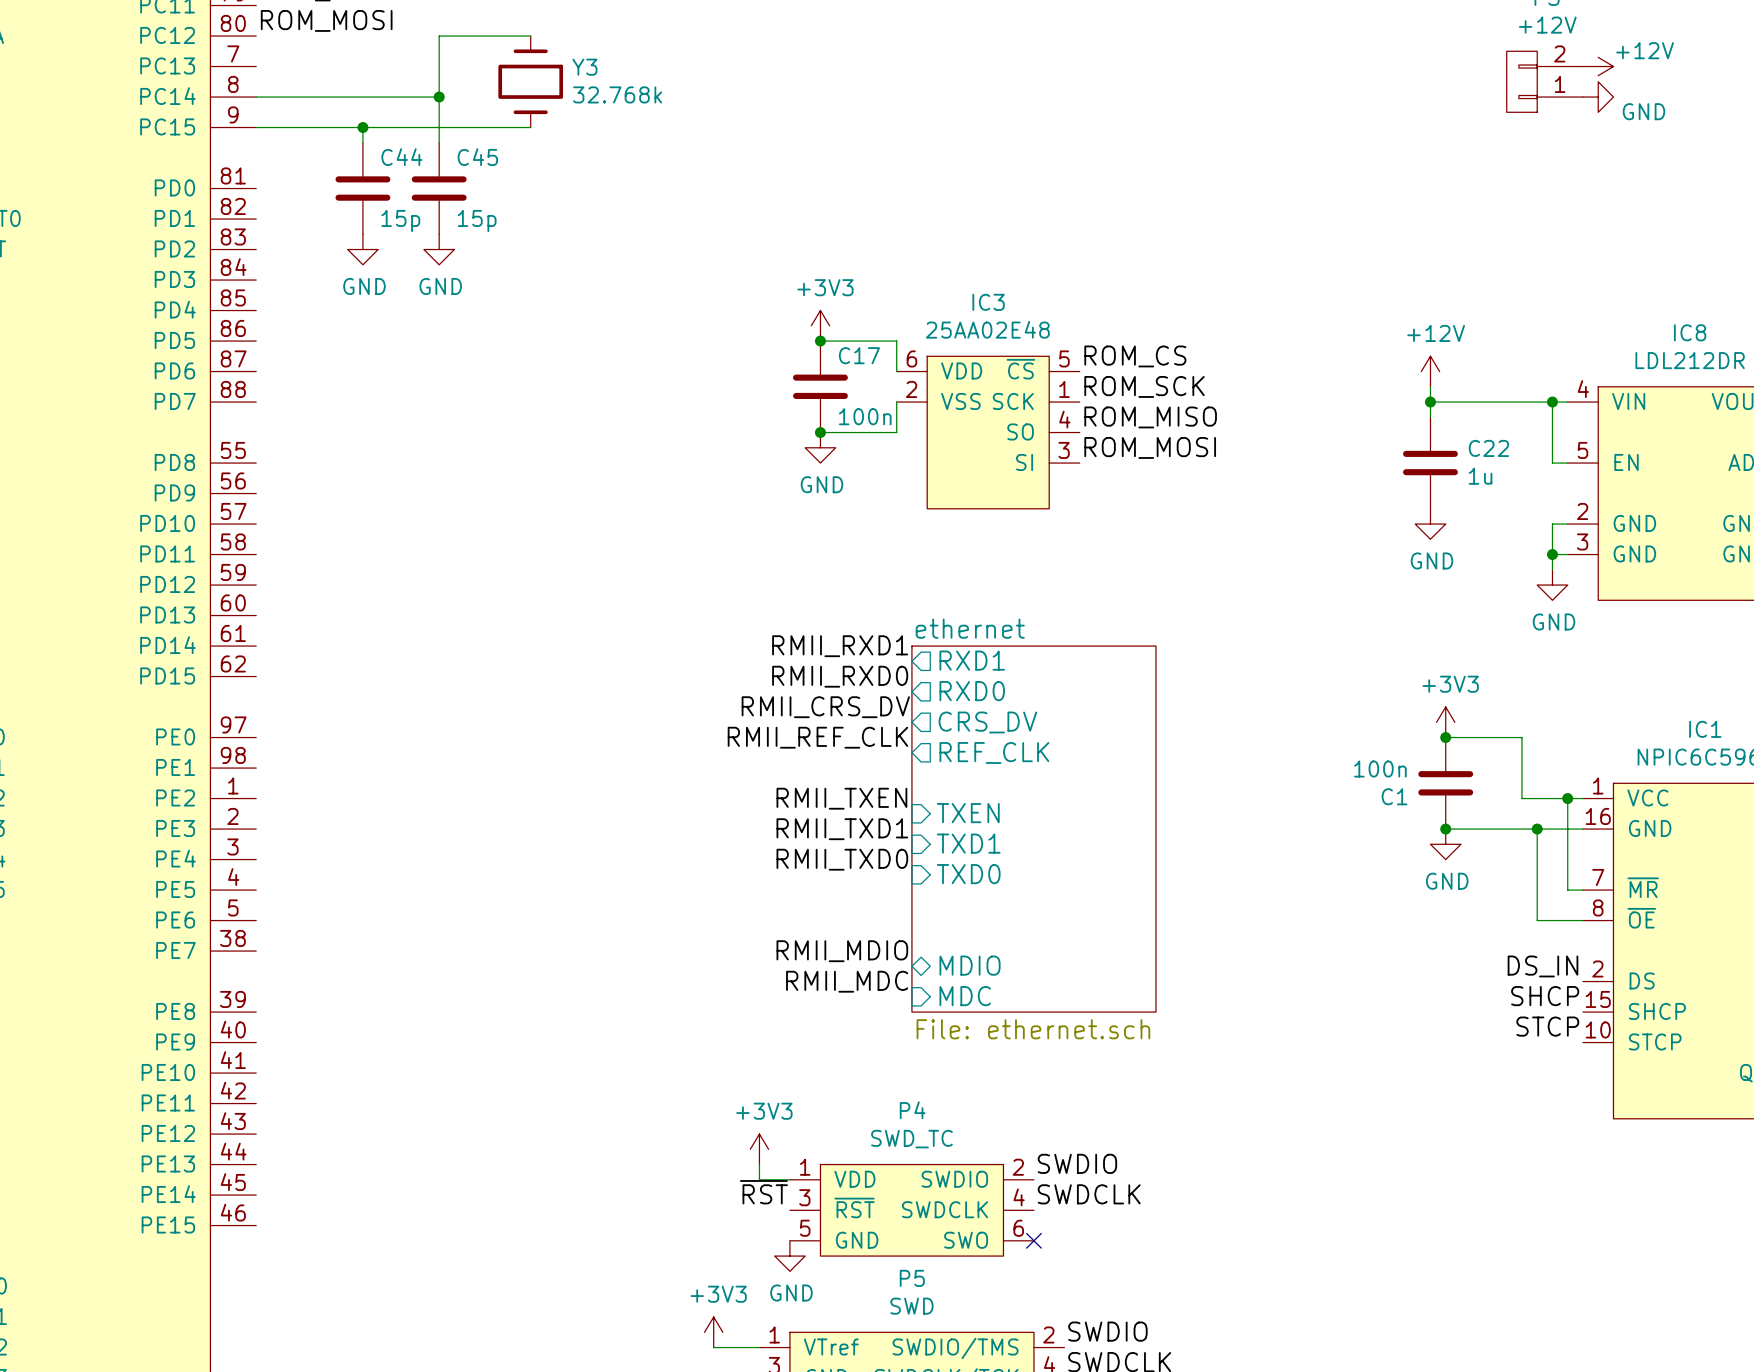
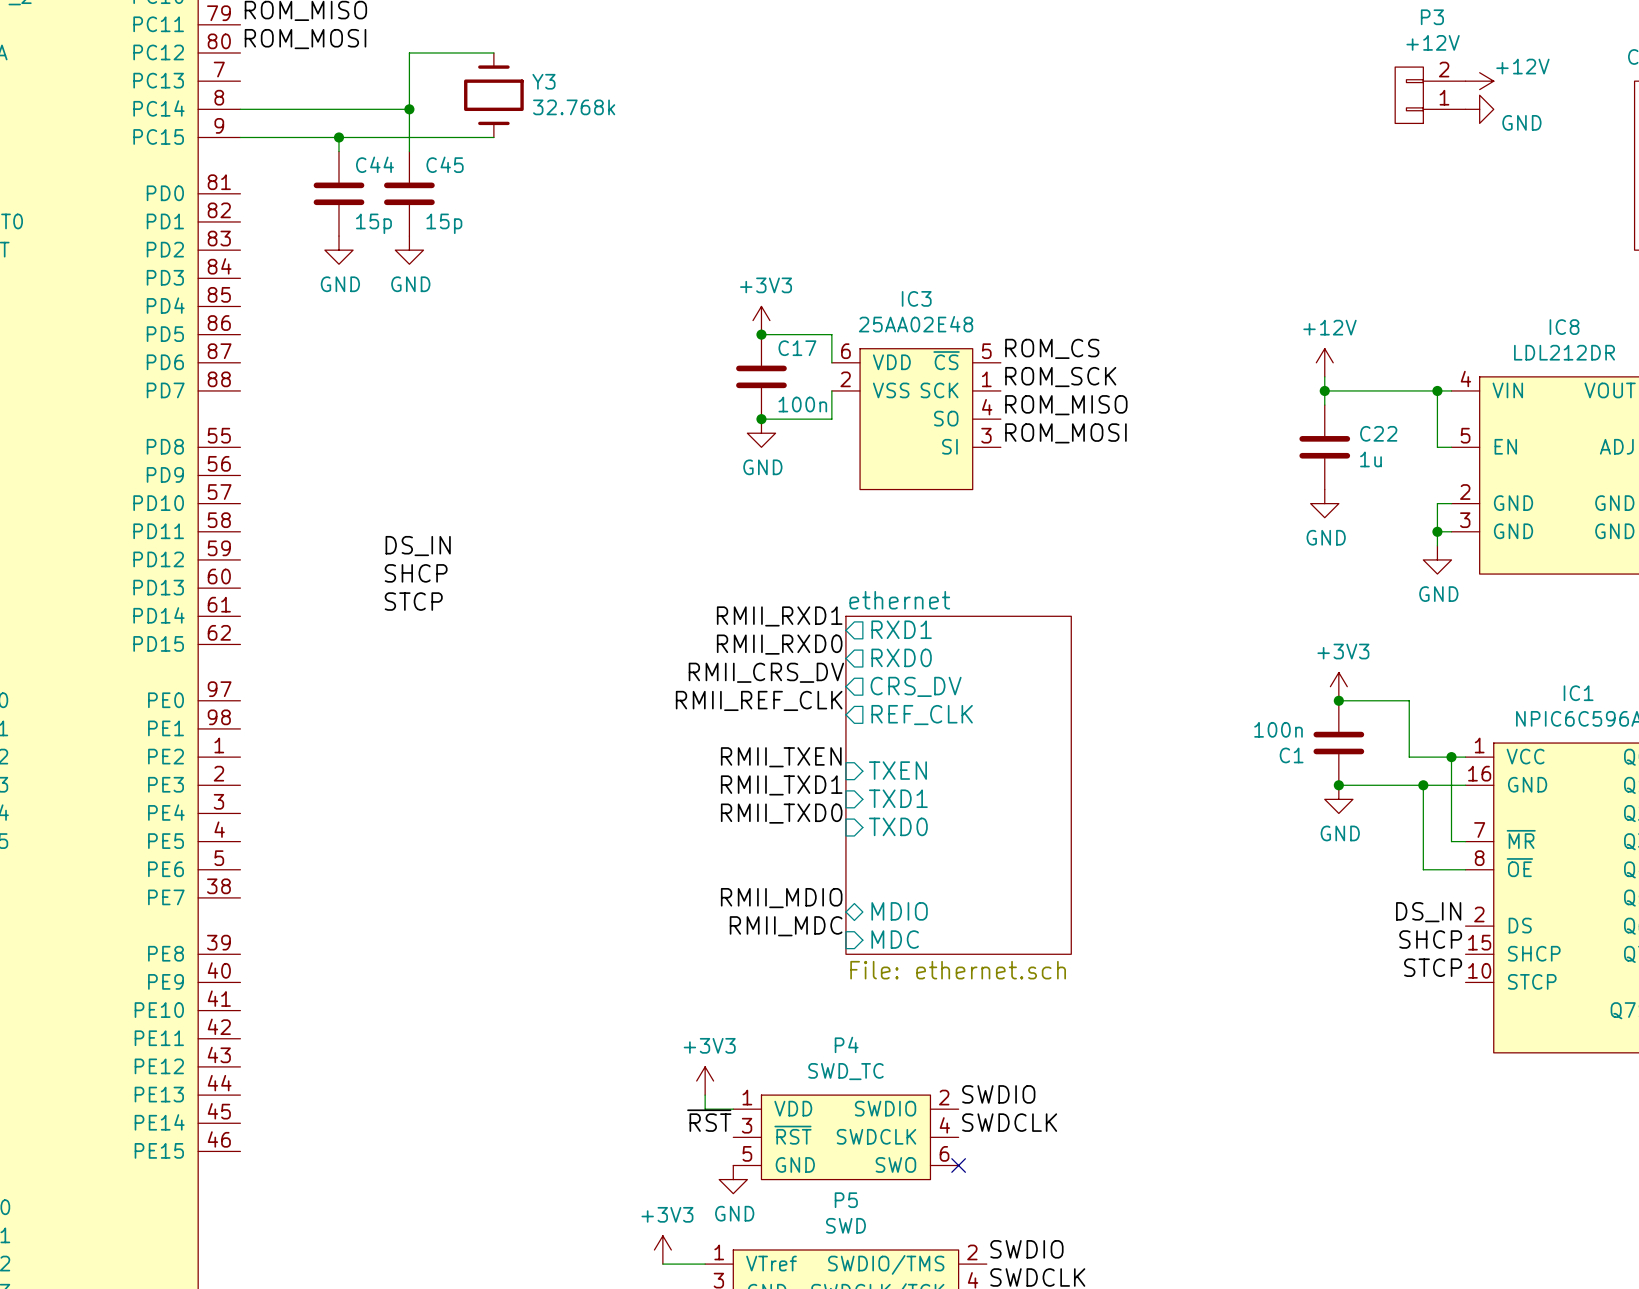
label: none -> DS_IN (418, 546)
label: none -> SHCP (416, 573)
label: none -> STCP (413, 601)

